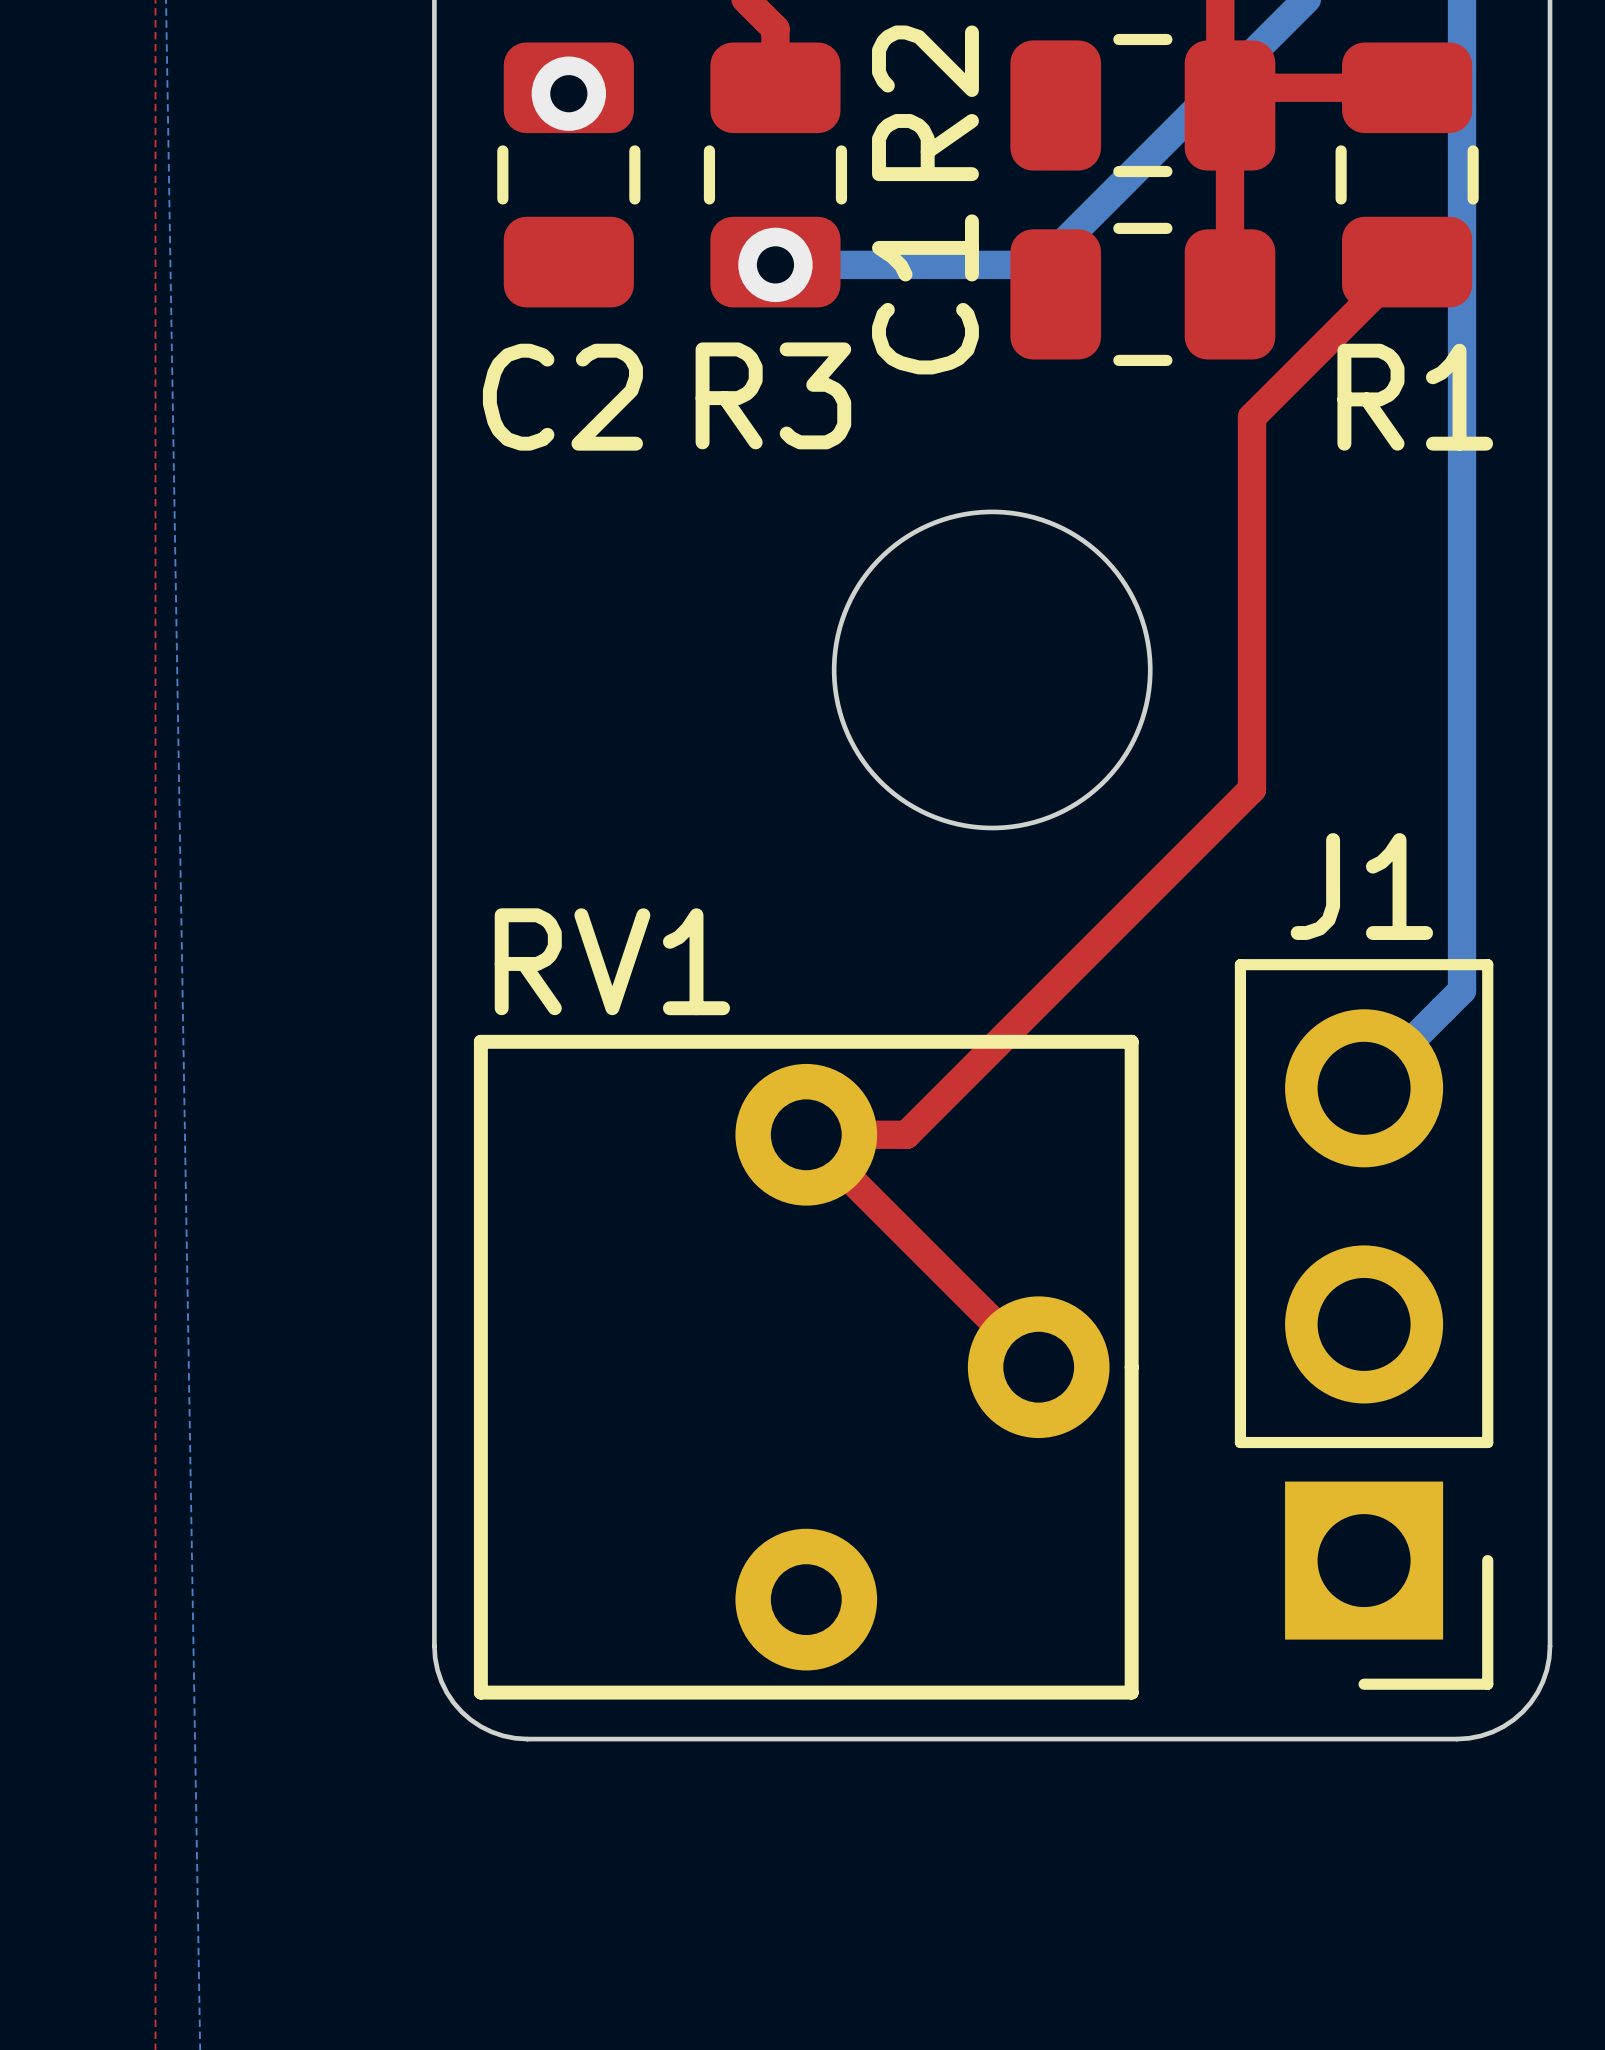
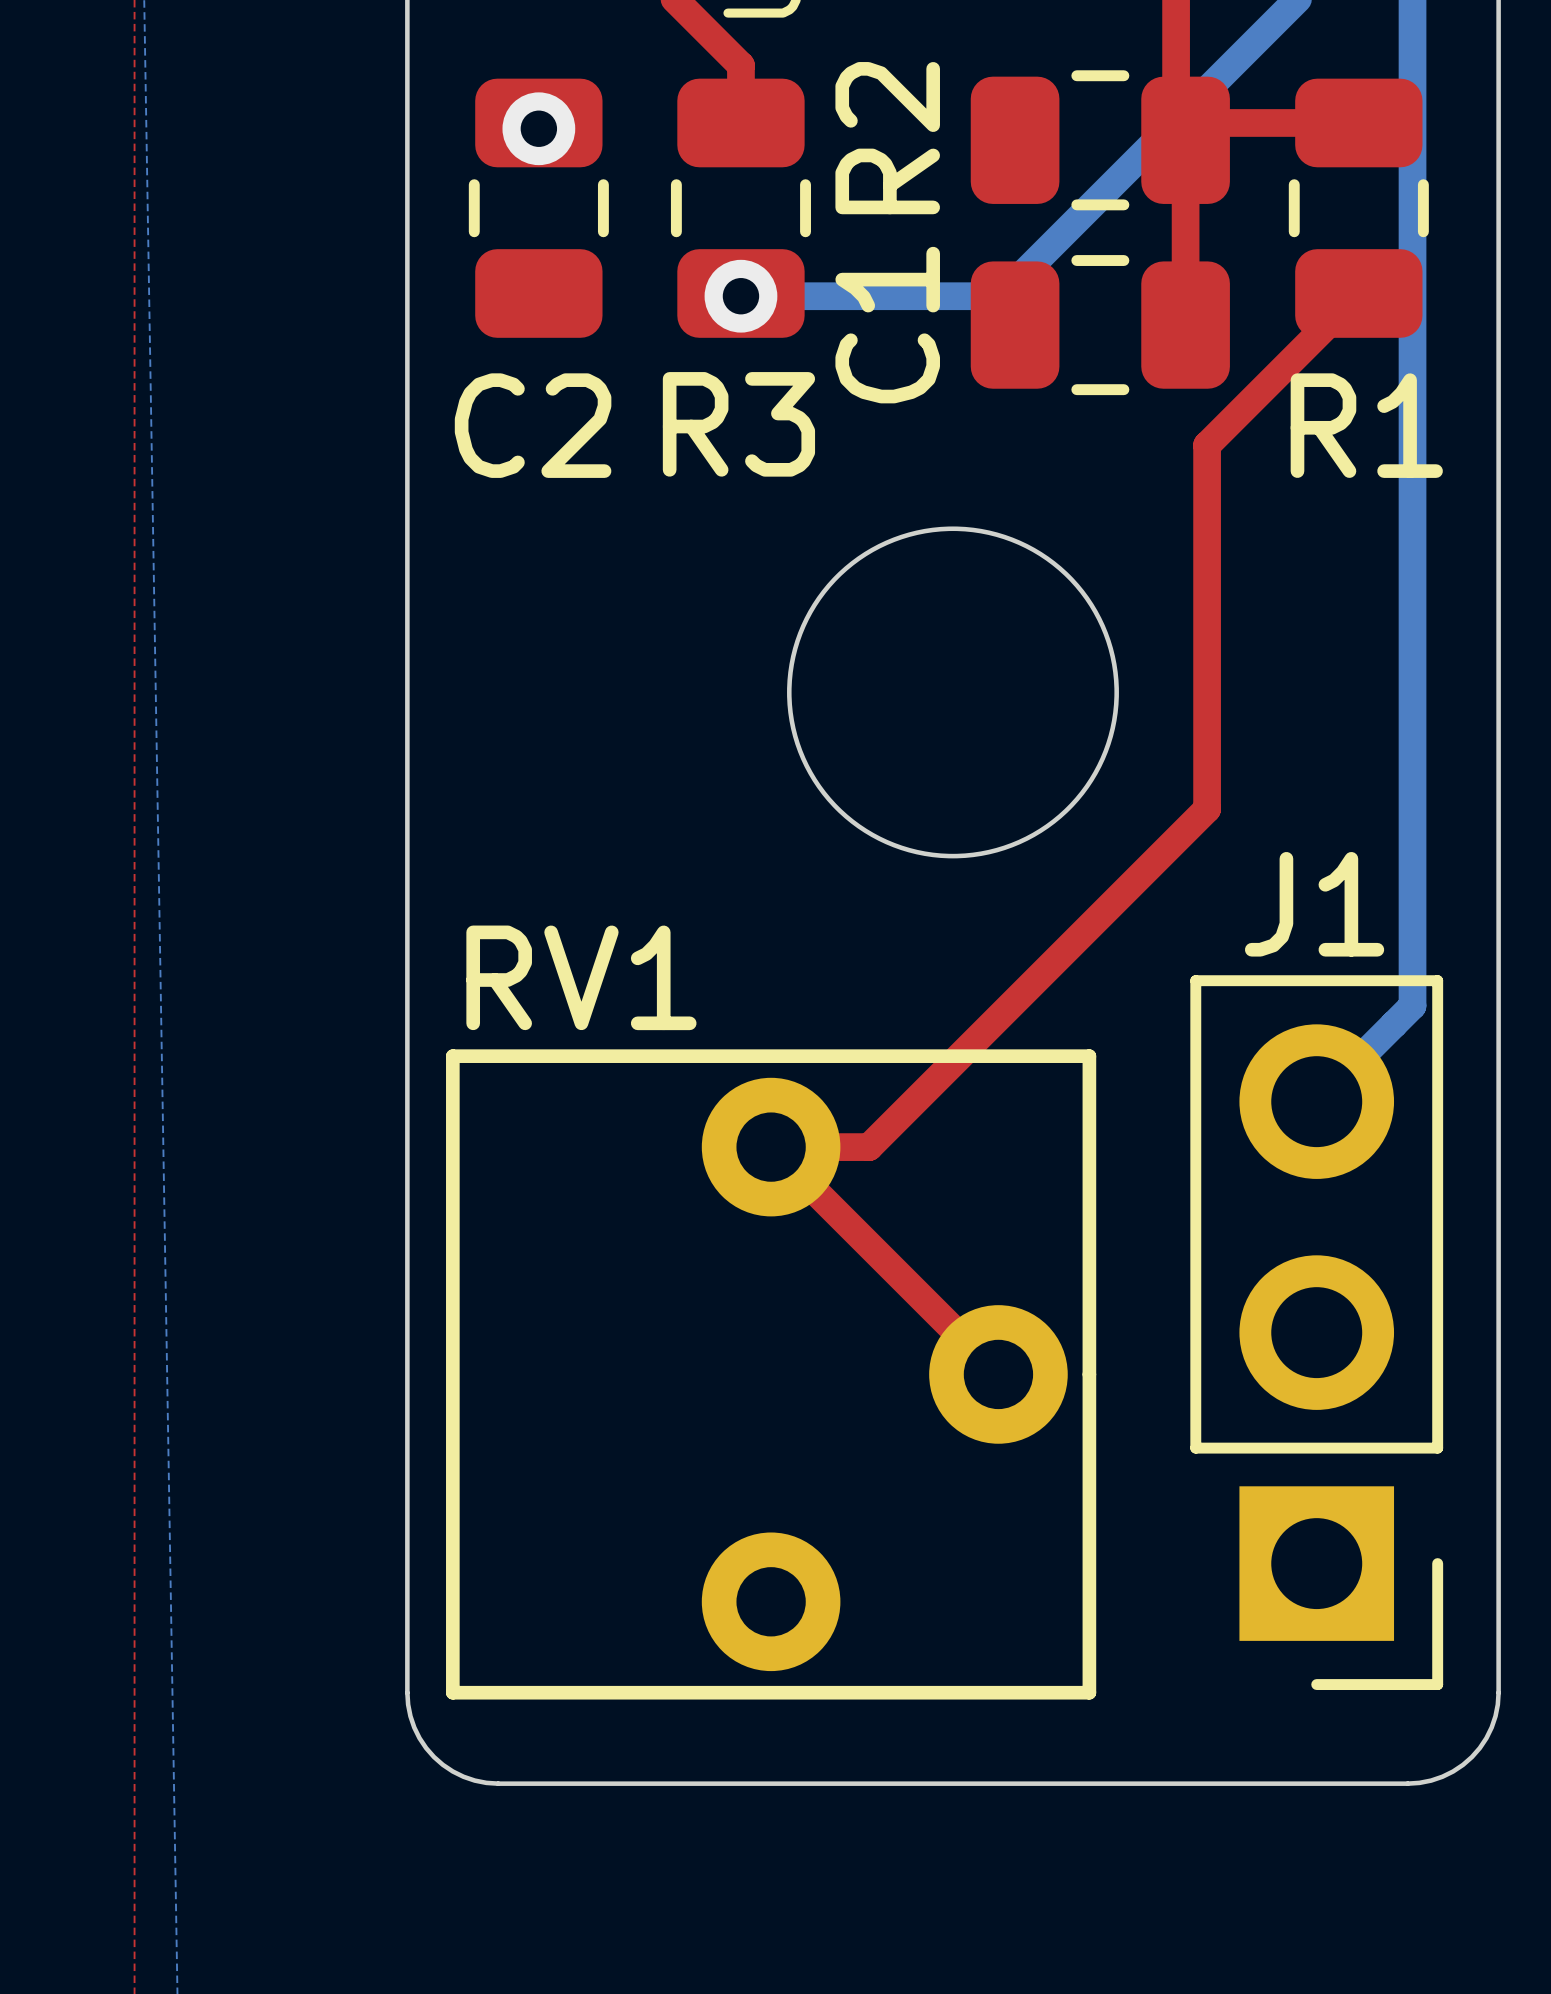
round board edge size: [831, 509, 1153, 831] -> [787, 526, 1119, 859]
board edge: (434, 1646) (435, 1658) (441, 1681) (446, 1692) (461, 1711) (470, 1719) (491, 1732) (515, 1738) (527, 1739) (1469, 1738) (1492, 1732) (1503, 1726) (1522, 1711) (1530, 1702) (1537, 1692) (1546, 1670) (1550, 1646) -> (407, 1647) (408, 1704) (410, 1716) (419, 1738) (434, 1757) (452, 1771) (474, 1780) (498, 1783) (1419, 1782) (1442, 1776) (1463, 1764) (1479, 1748) (1486, 1738) (1495, 1716) (1497, 1704) (1498, 1647)

